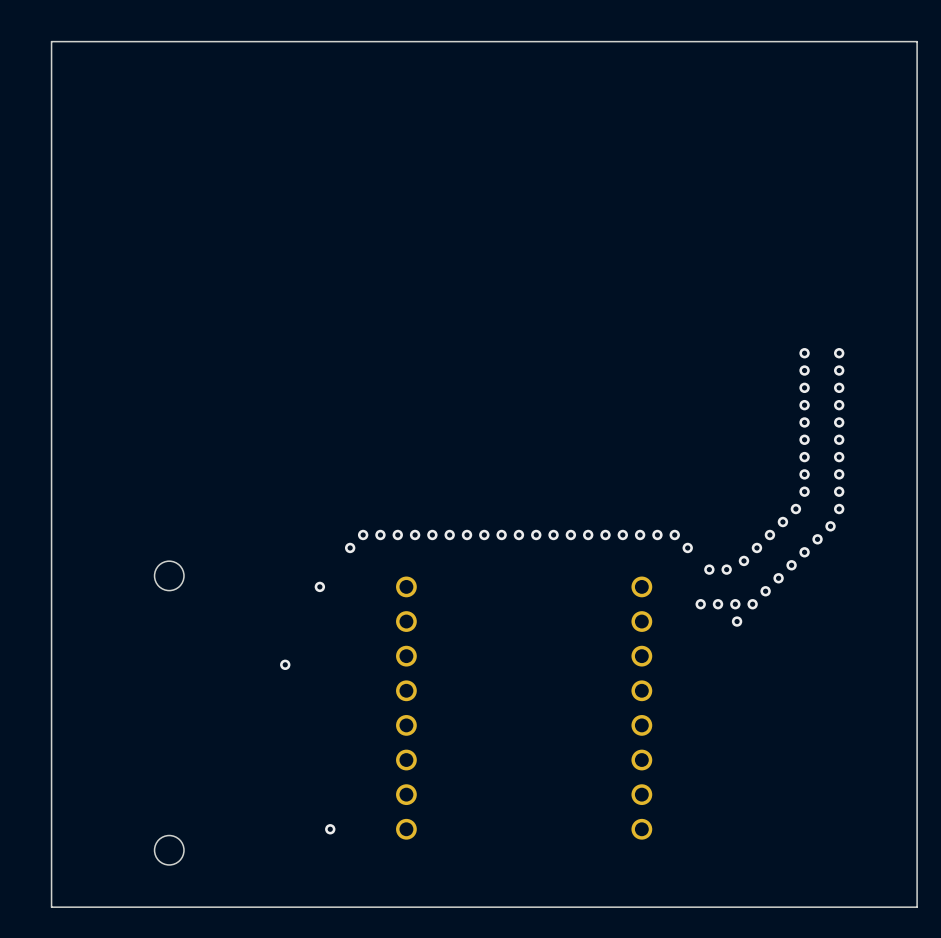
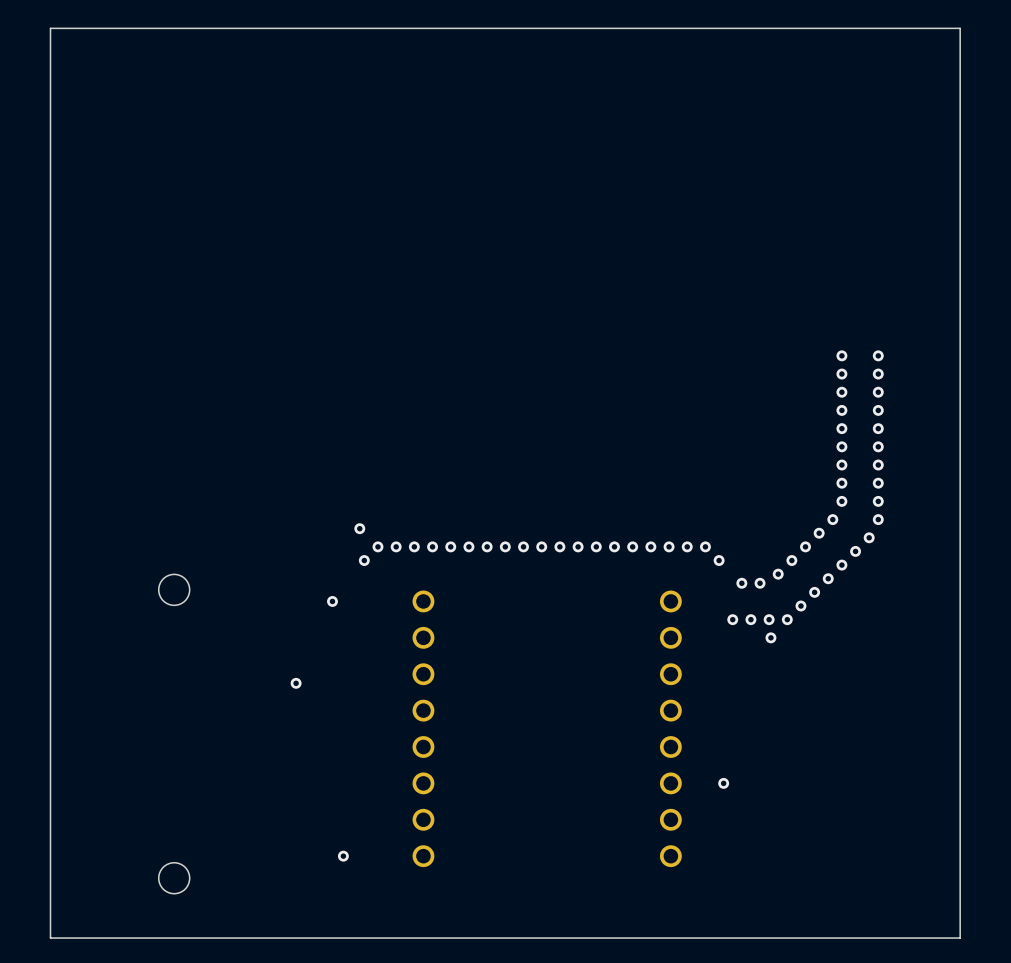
via: none -> (359, 528)
via: none -> (723, 783)

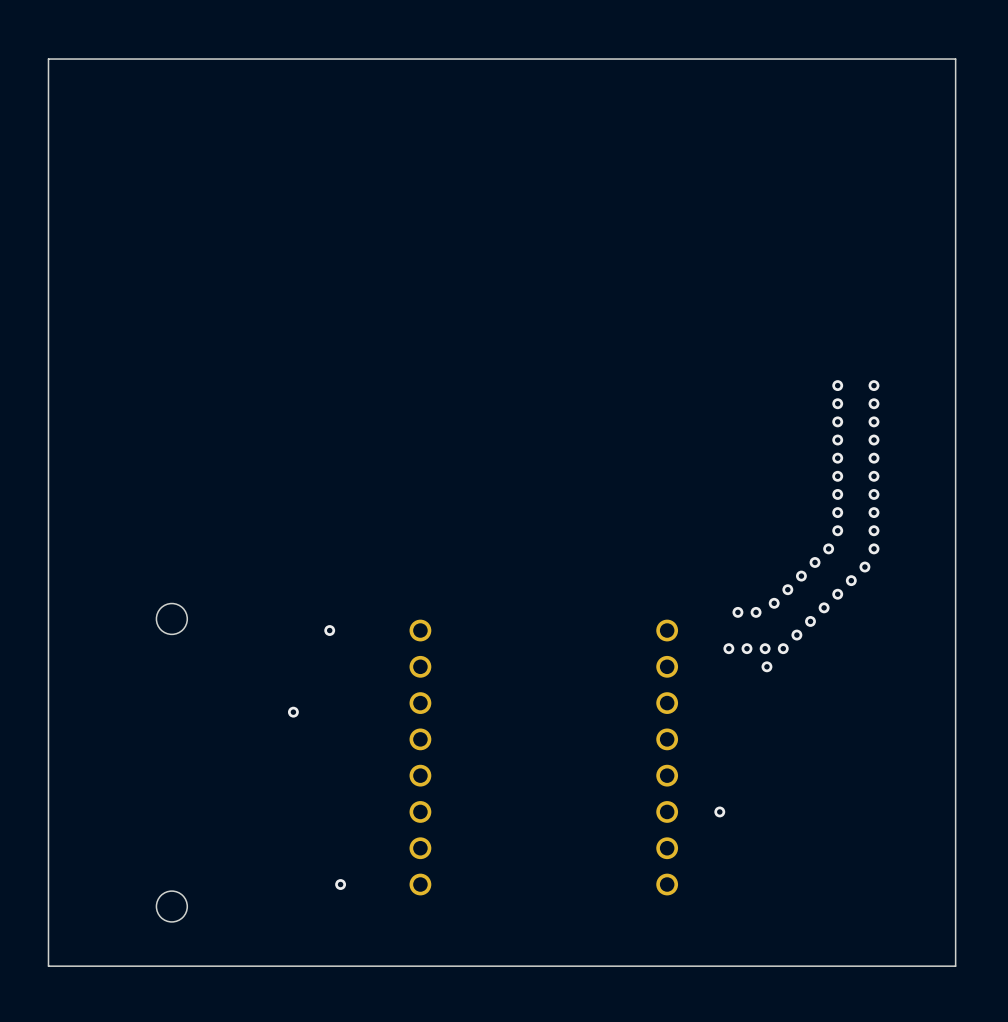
via: (359, 528) -> none
via: (377, 546) -> none
via: (396, 546) -> none
via: (414, 546) -> none
via: (432, 546) -> none
via: (450, 546) -> none
via: (468, 546) -> none
via: (487, 546) -> none
via: (505, 546) -> none
via: (523, 546) -> none
via: (541, 546) -> none
via: (559, 546) -> none
via: (578, 546) -> none
via: (596, 546) -> none
via: (614, 546) -> none
via: (632, 546) -> none
via: (650, 546) -> none
via: (669, 546) -> none
via: (687, 546) -> none
via: (705, 546) -> none
via: (364, 560) -> none
via: (719, 560) -> none

